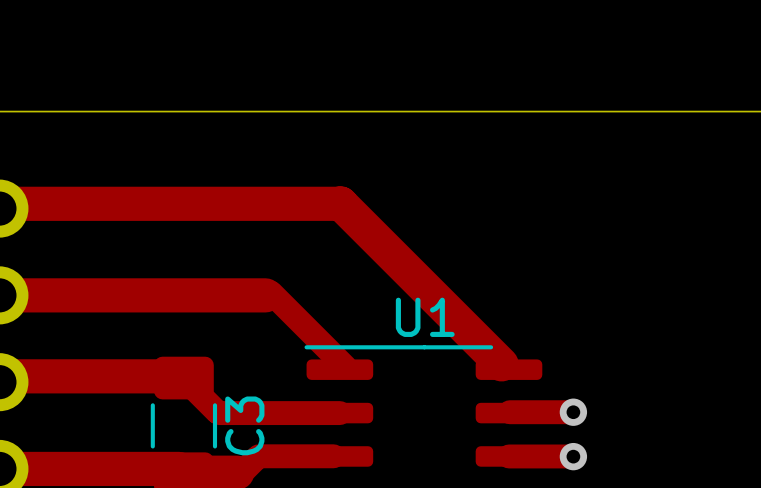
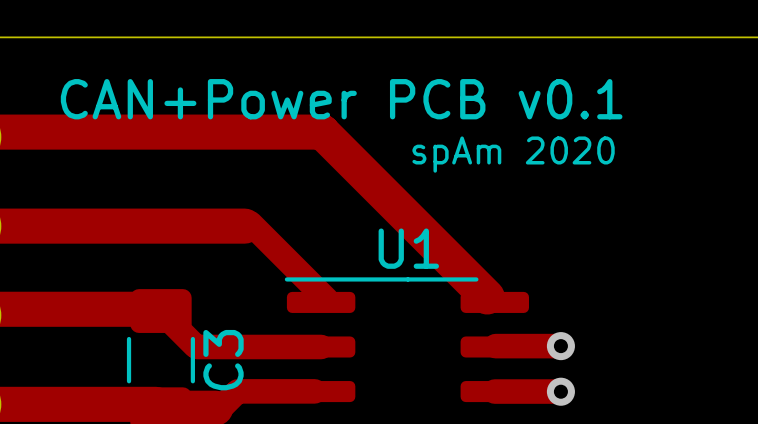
text: none -> CAN+Power PCB v0.1 (341, 99)
text: none -> spAm 2020 (513, 154)

